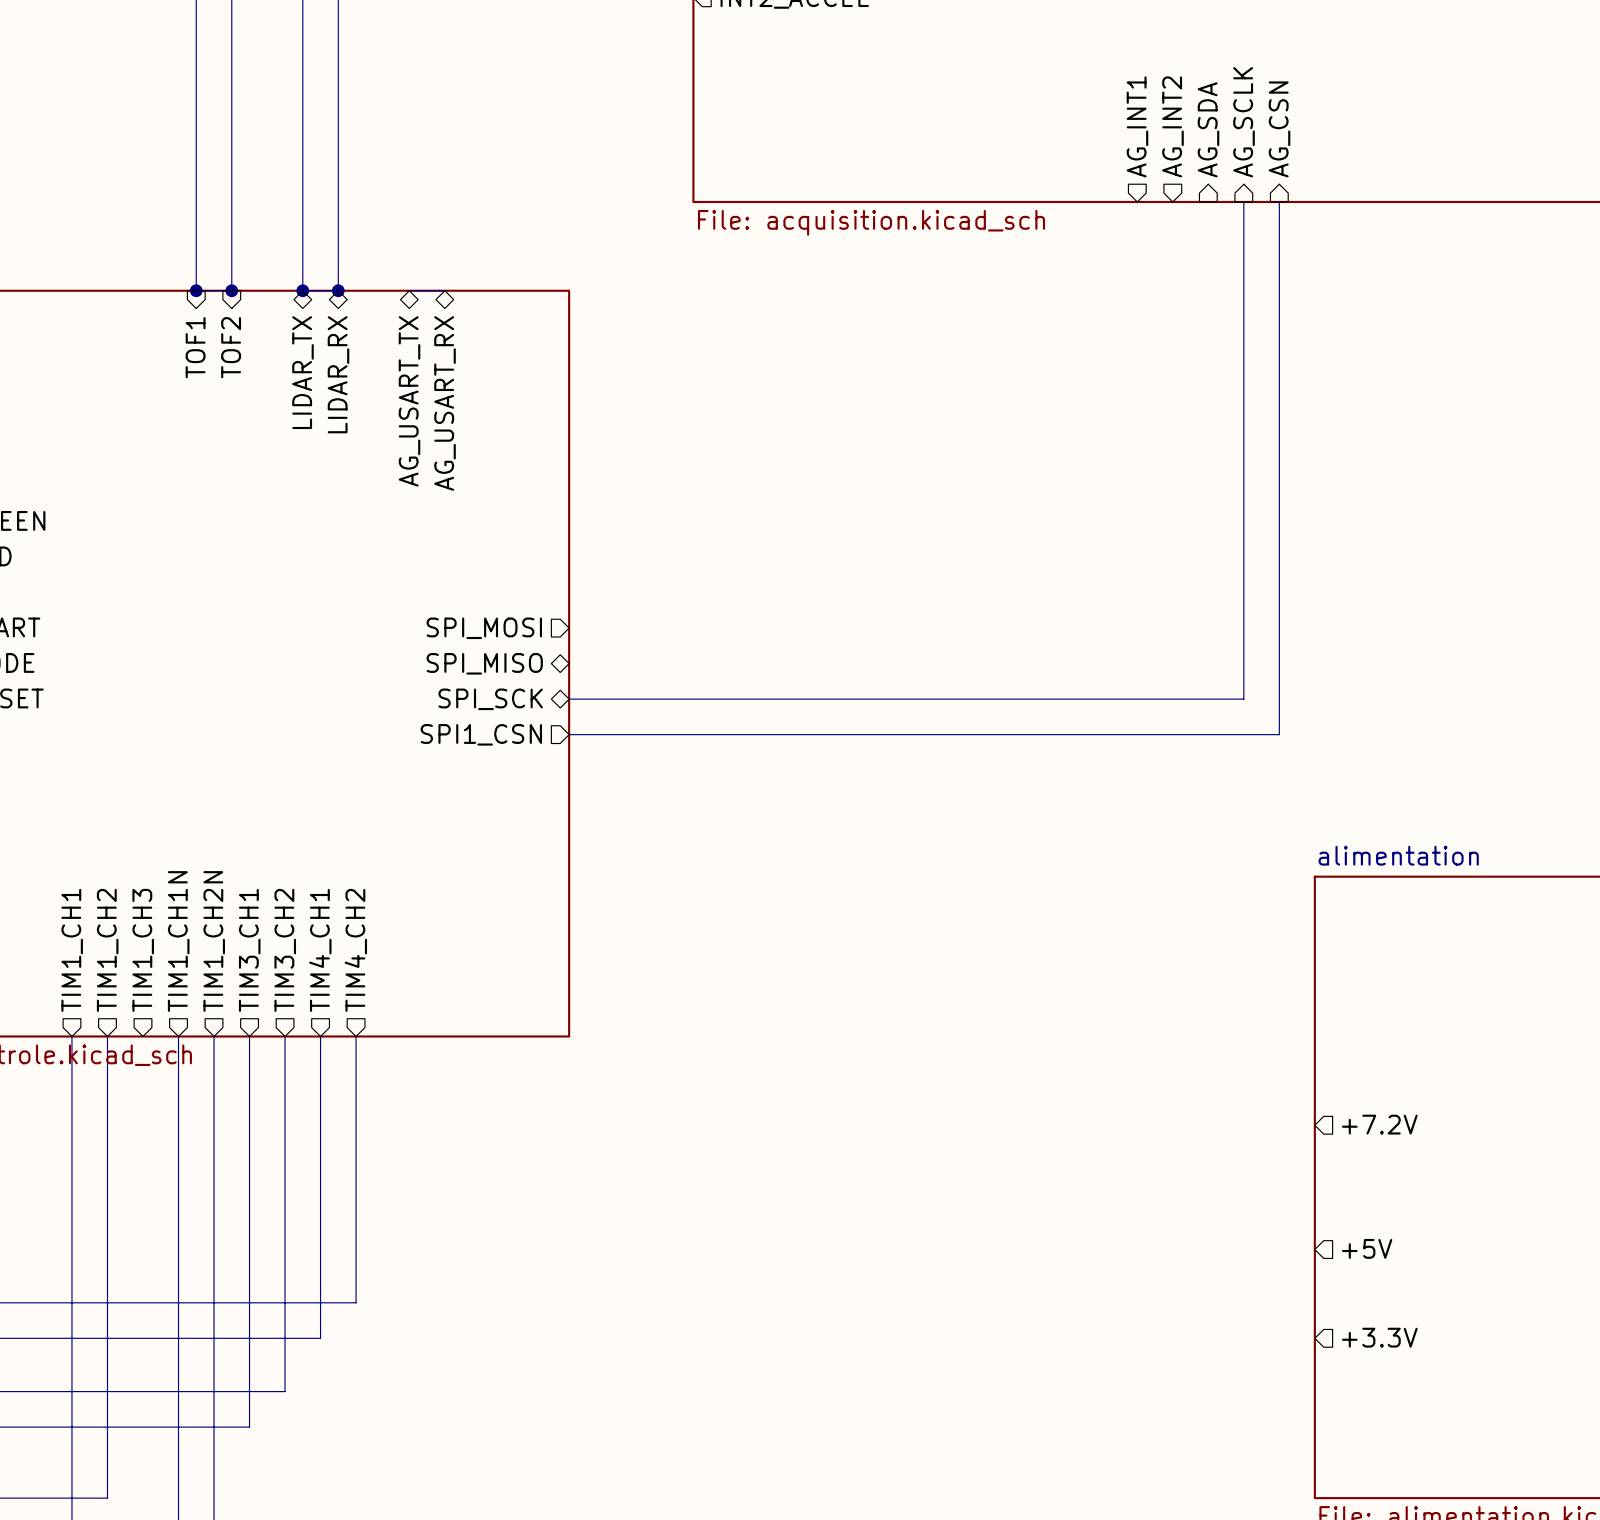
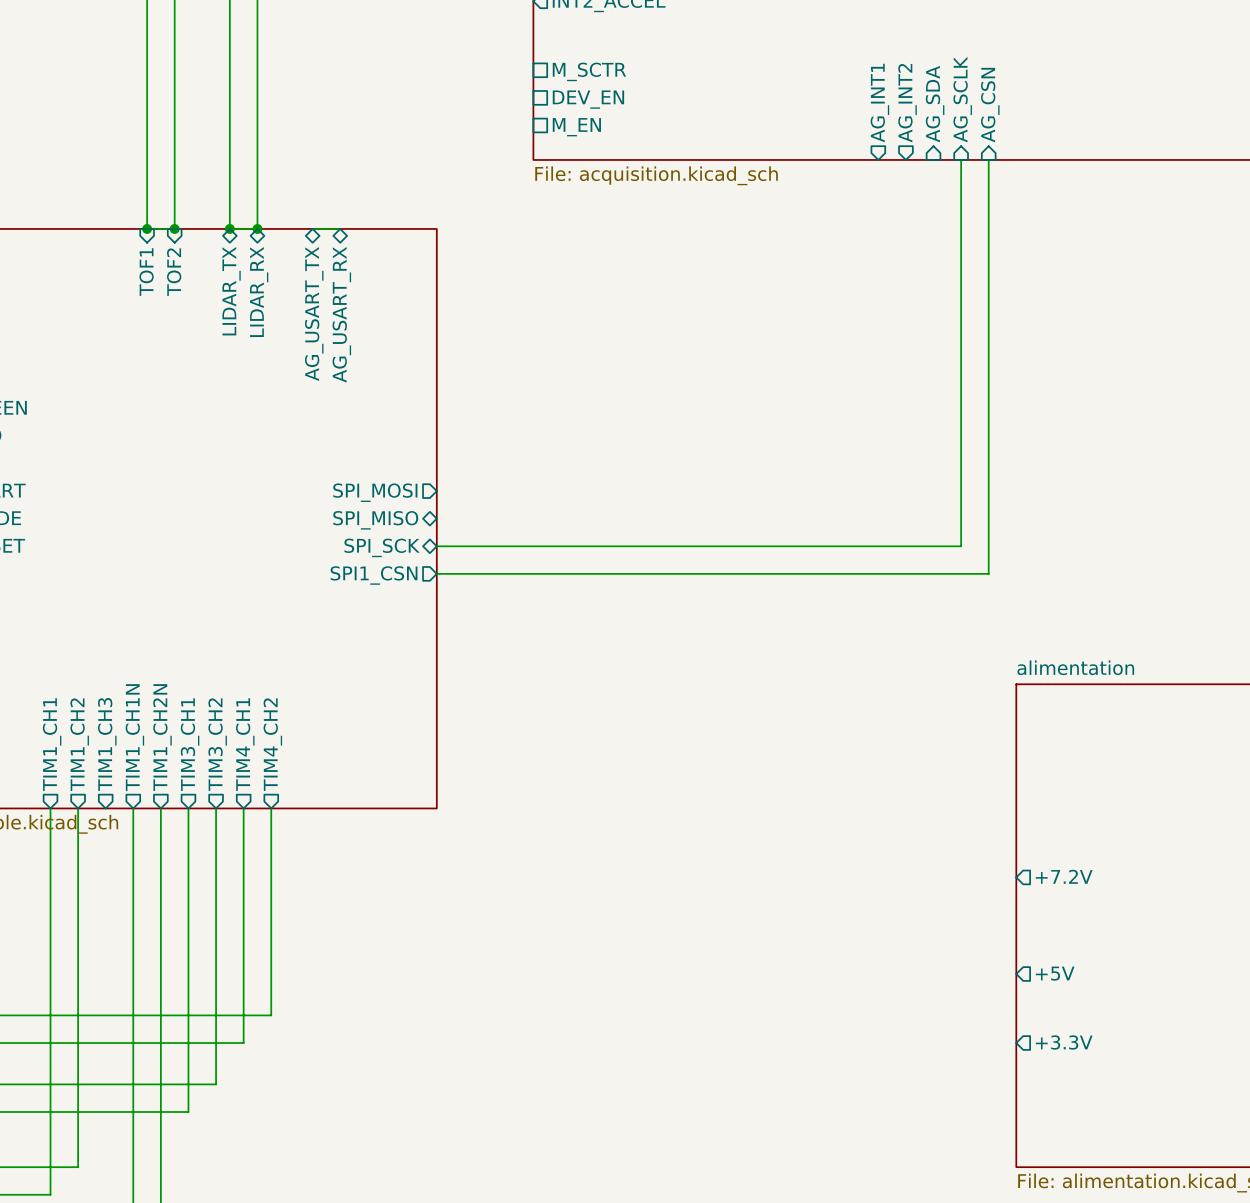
sheet pin: none -> M_SCTR (589, 71)
sheet pin: none -> DEV_EN (588, 99)
sheet pin: none -> M_EN (576, 127)

